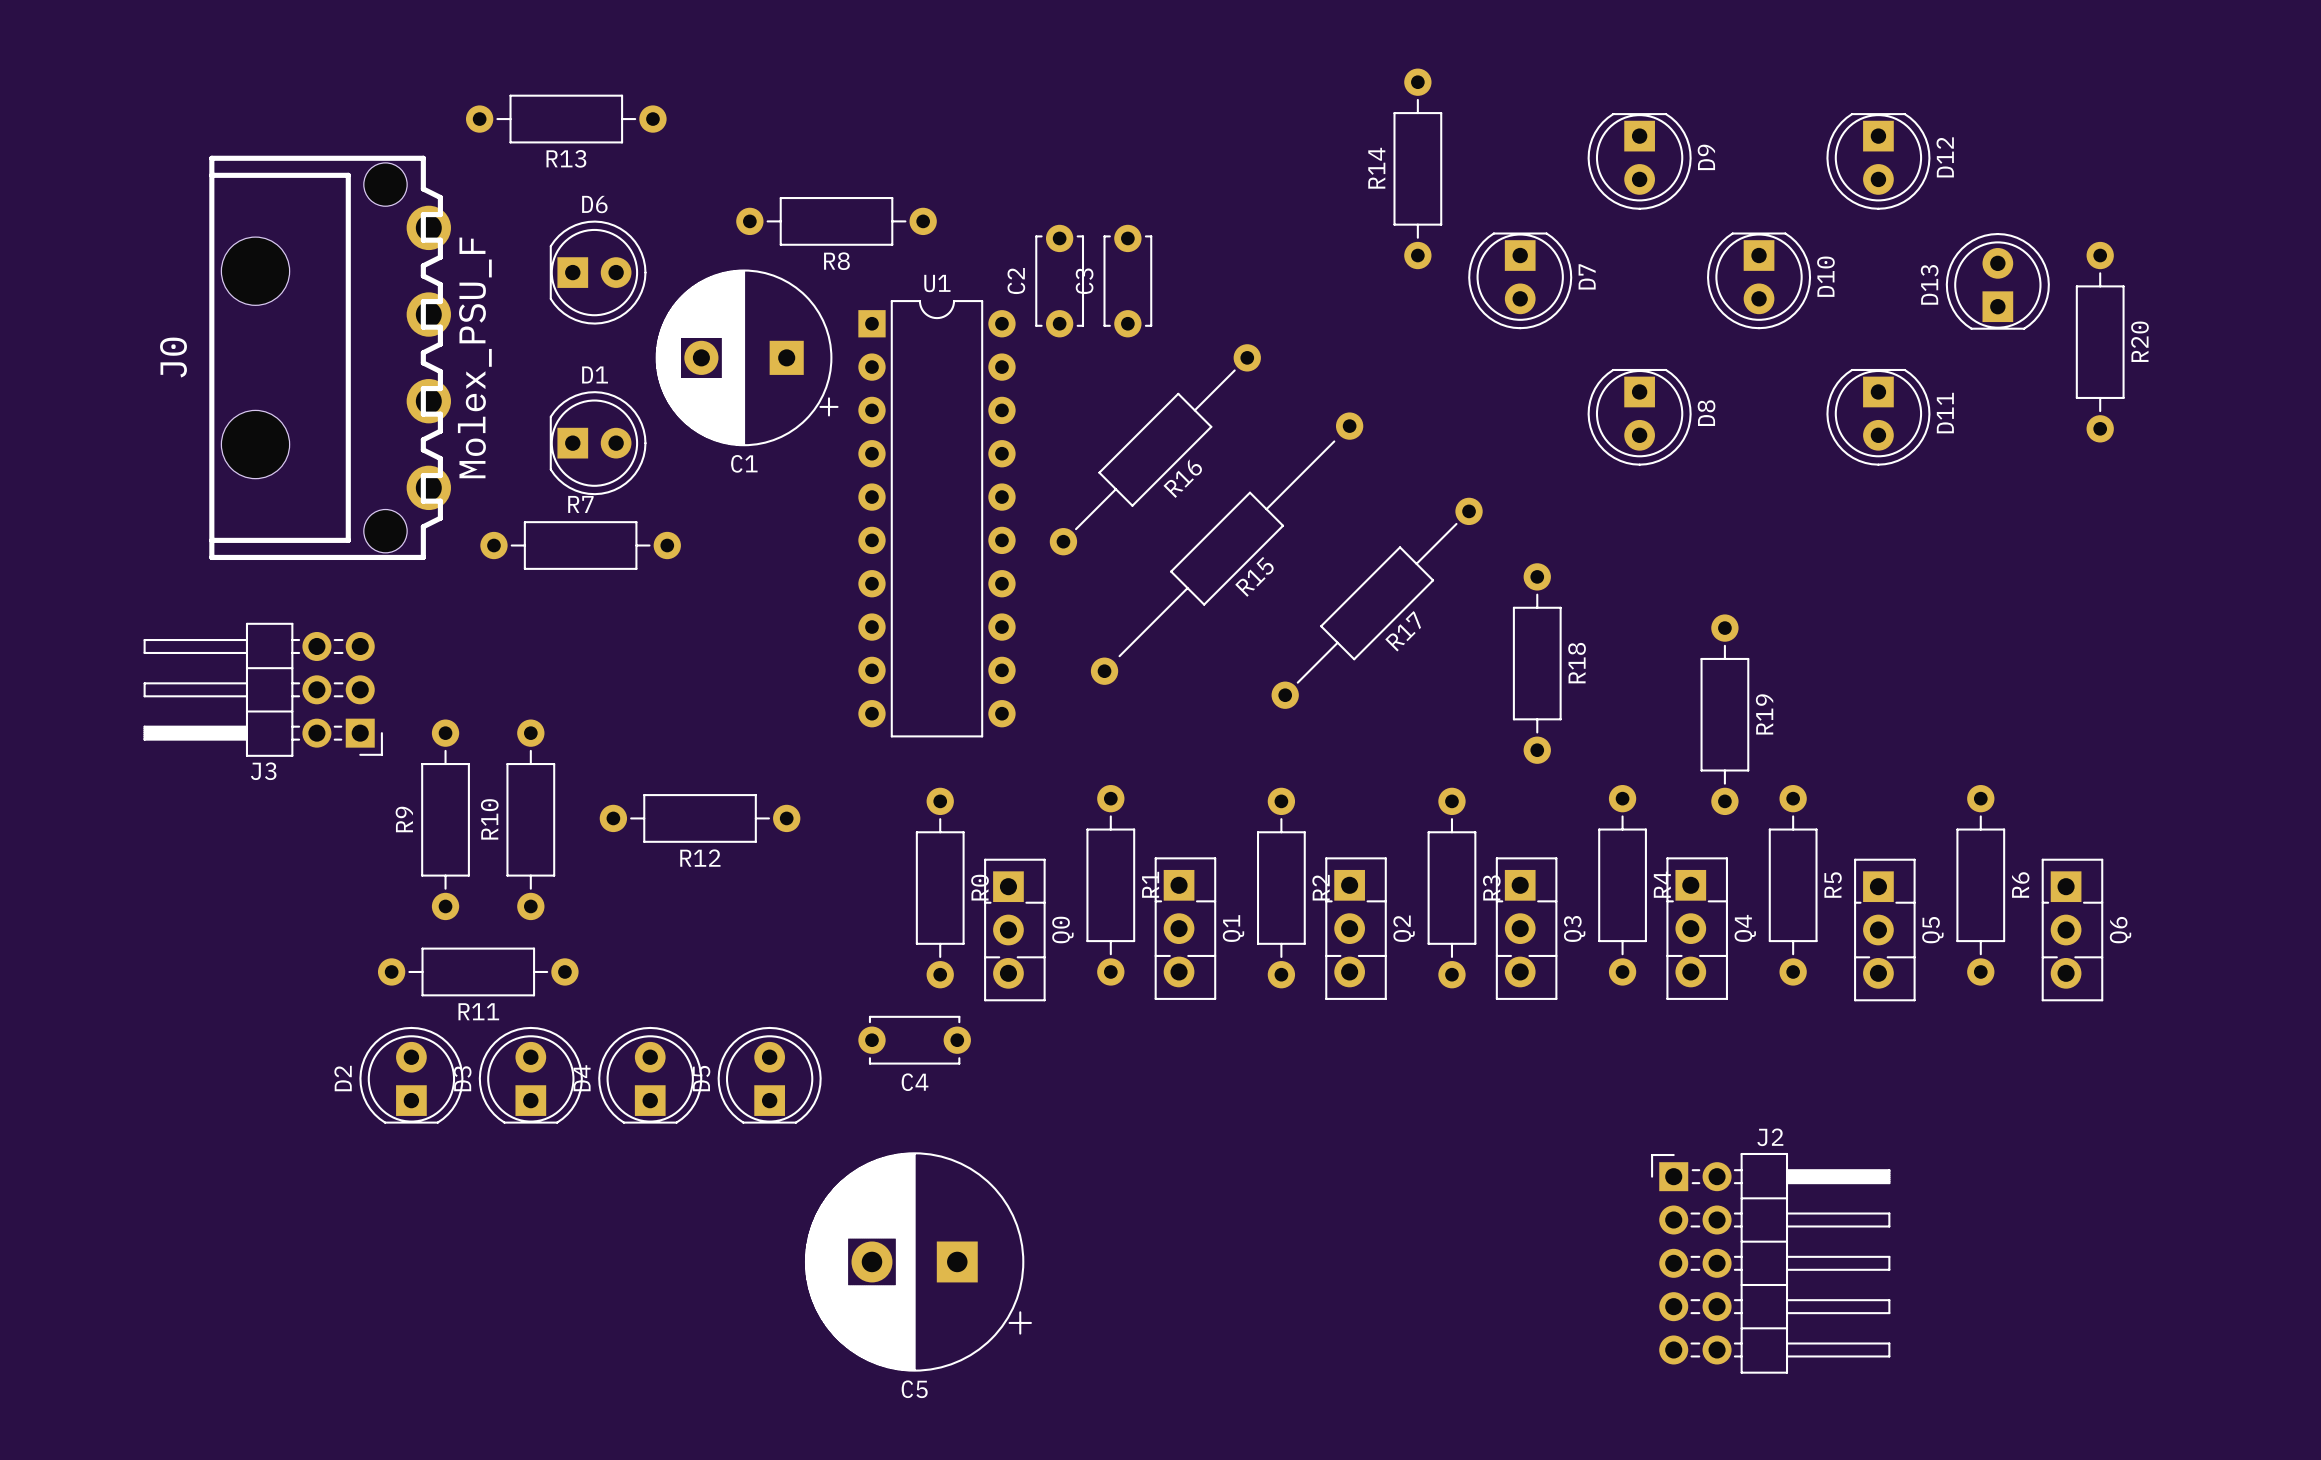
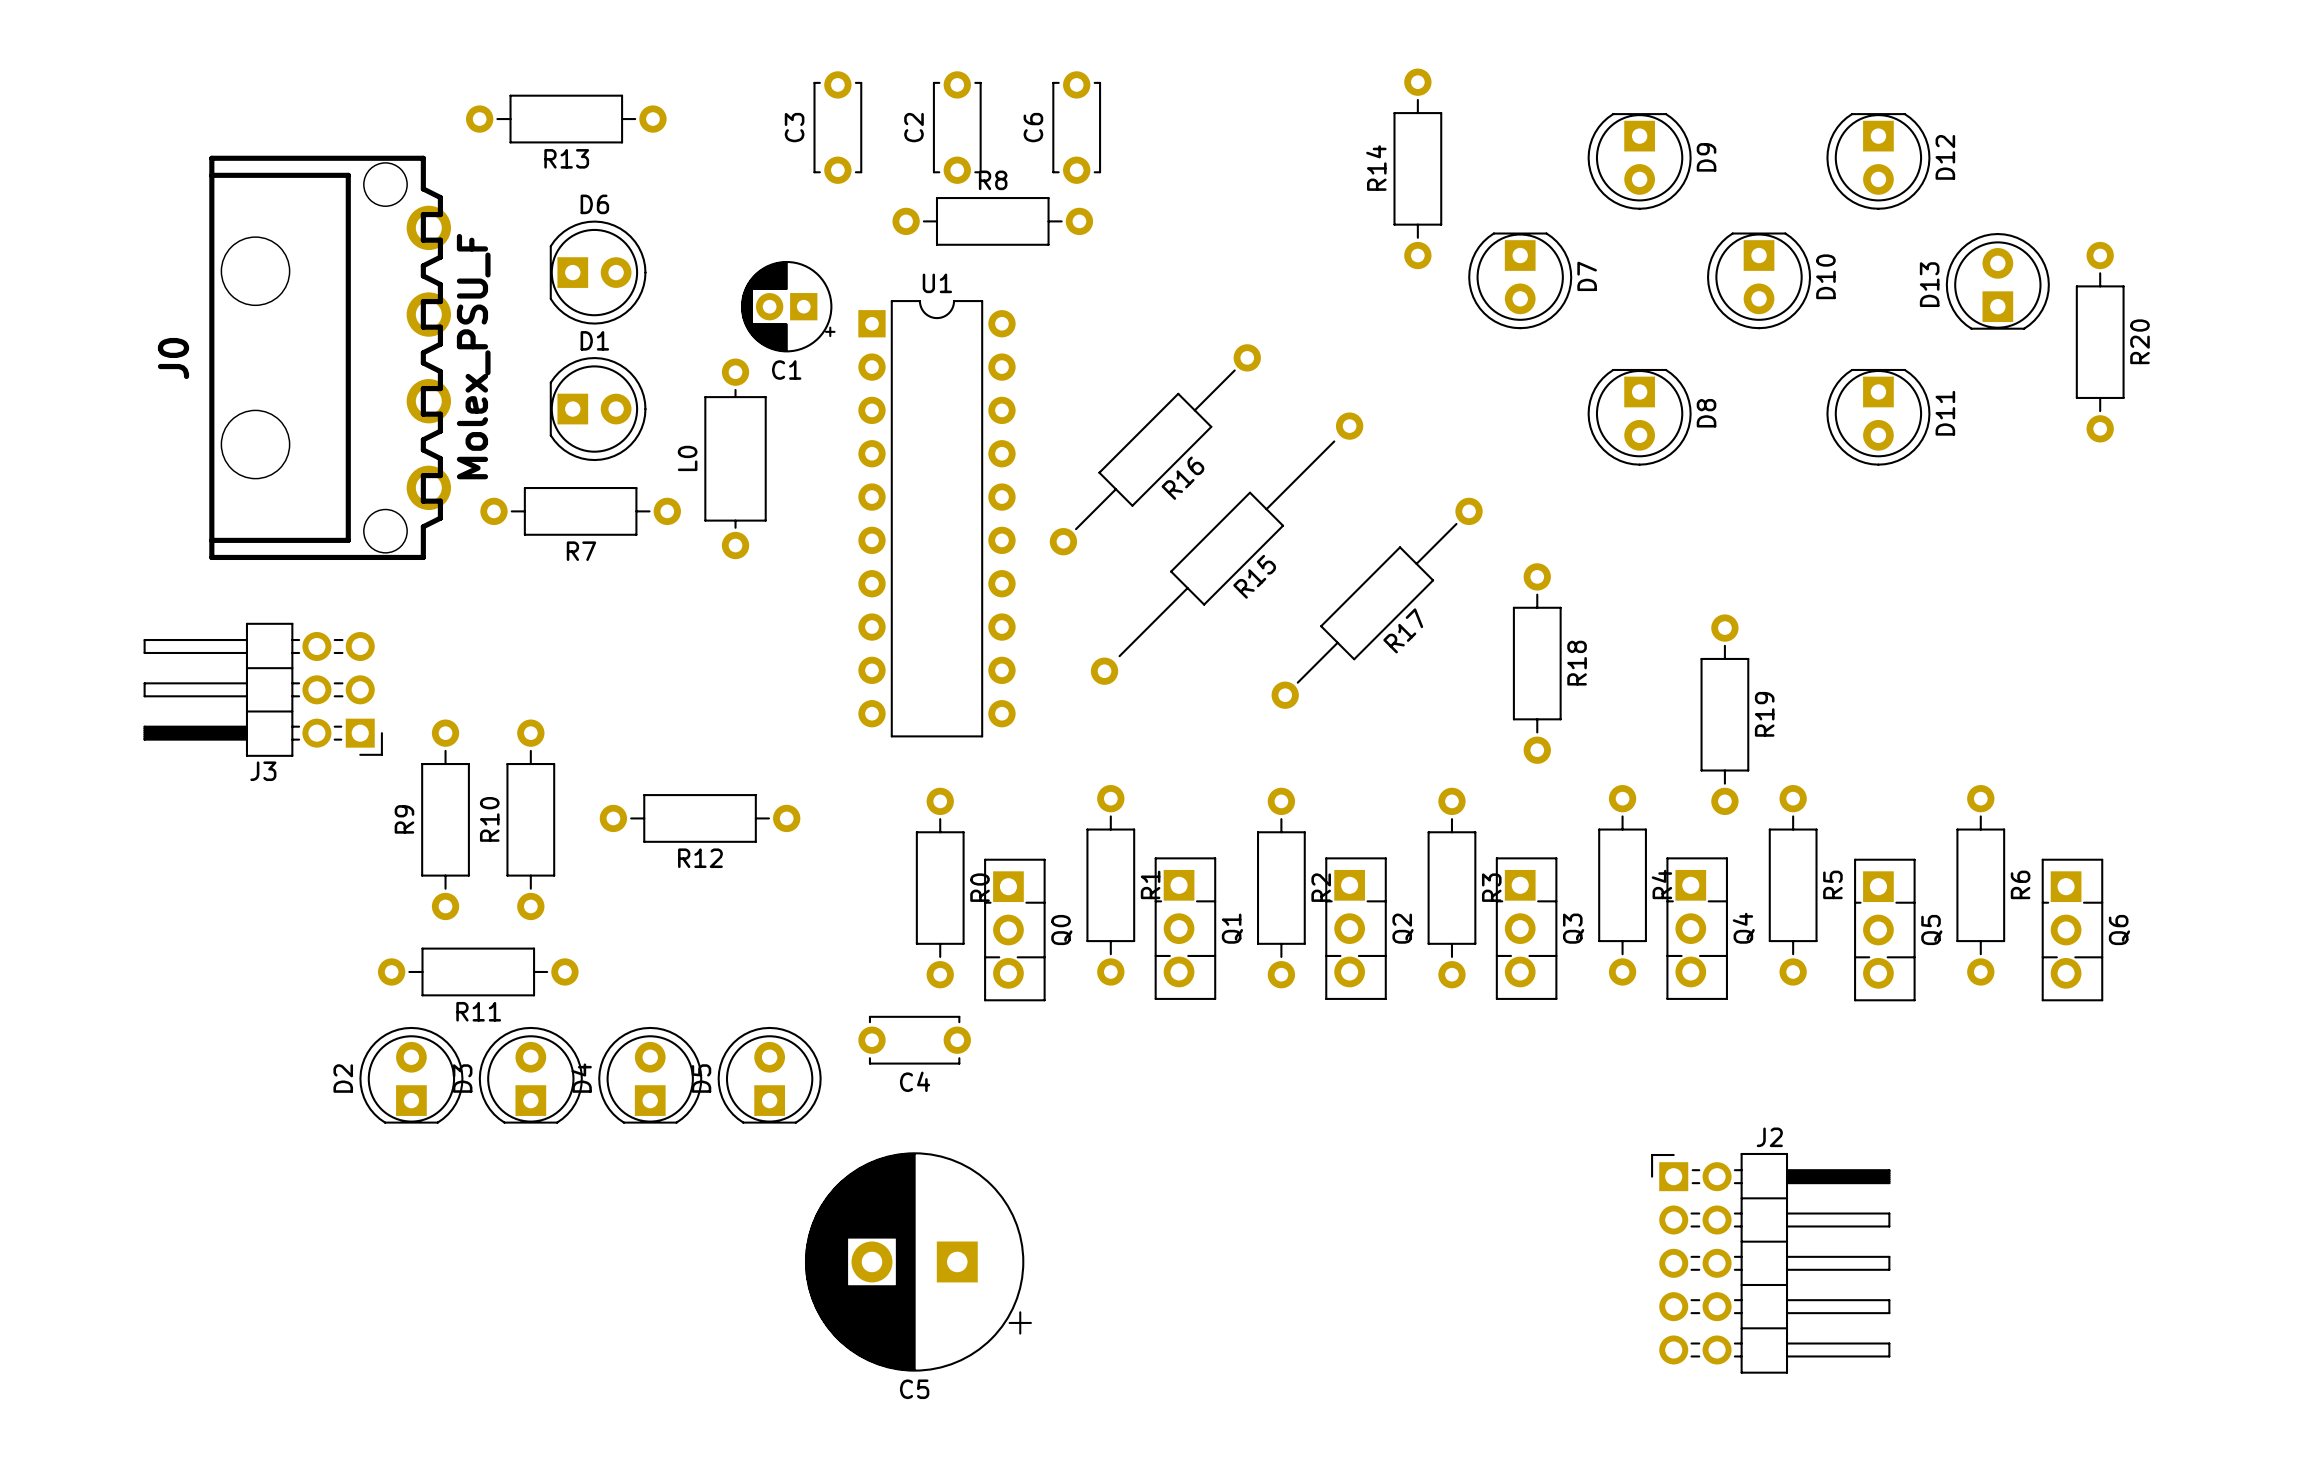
C6: none -> (1076, 127)
R8 position: (836, 221) -> (992, 221)
R8 name position: R8 (836, 261) -> R8 (993, 180)
C1 footprint: [655, 269, 839, 447] -> [740, 260, 836, 353]
C2 position: (1059, 281) -> (957, 127)
C3 position: (1127, 281) -> (837, 127)
D1 position: (598, 443) -> (598, 409)
L0: none -> (735, 458)
C1 name position: C1 (744, 463) -> C1 (786, 370)
R7 name position: R7 (580, 504) -> R7 (581, 551)
R7 position: (580, 545) -> (580, 511)

